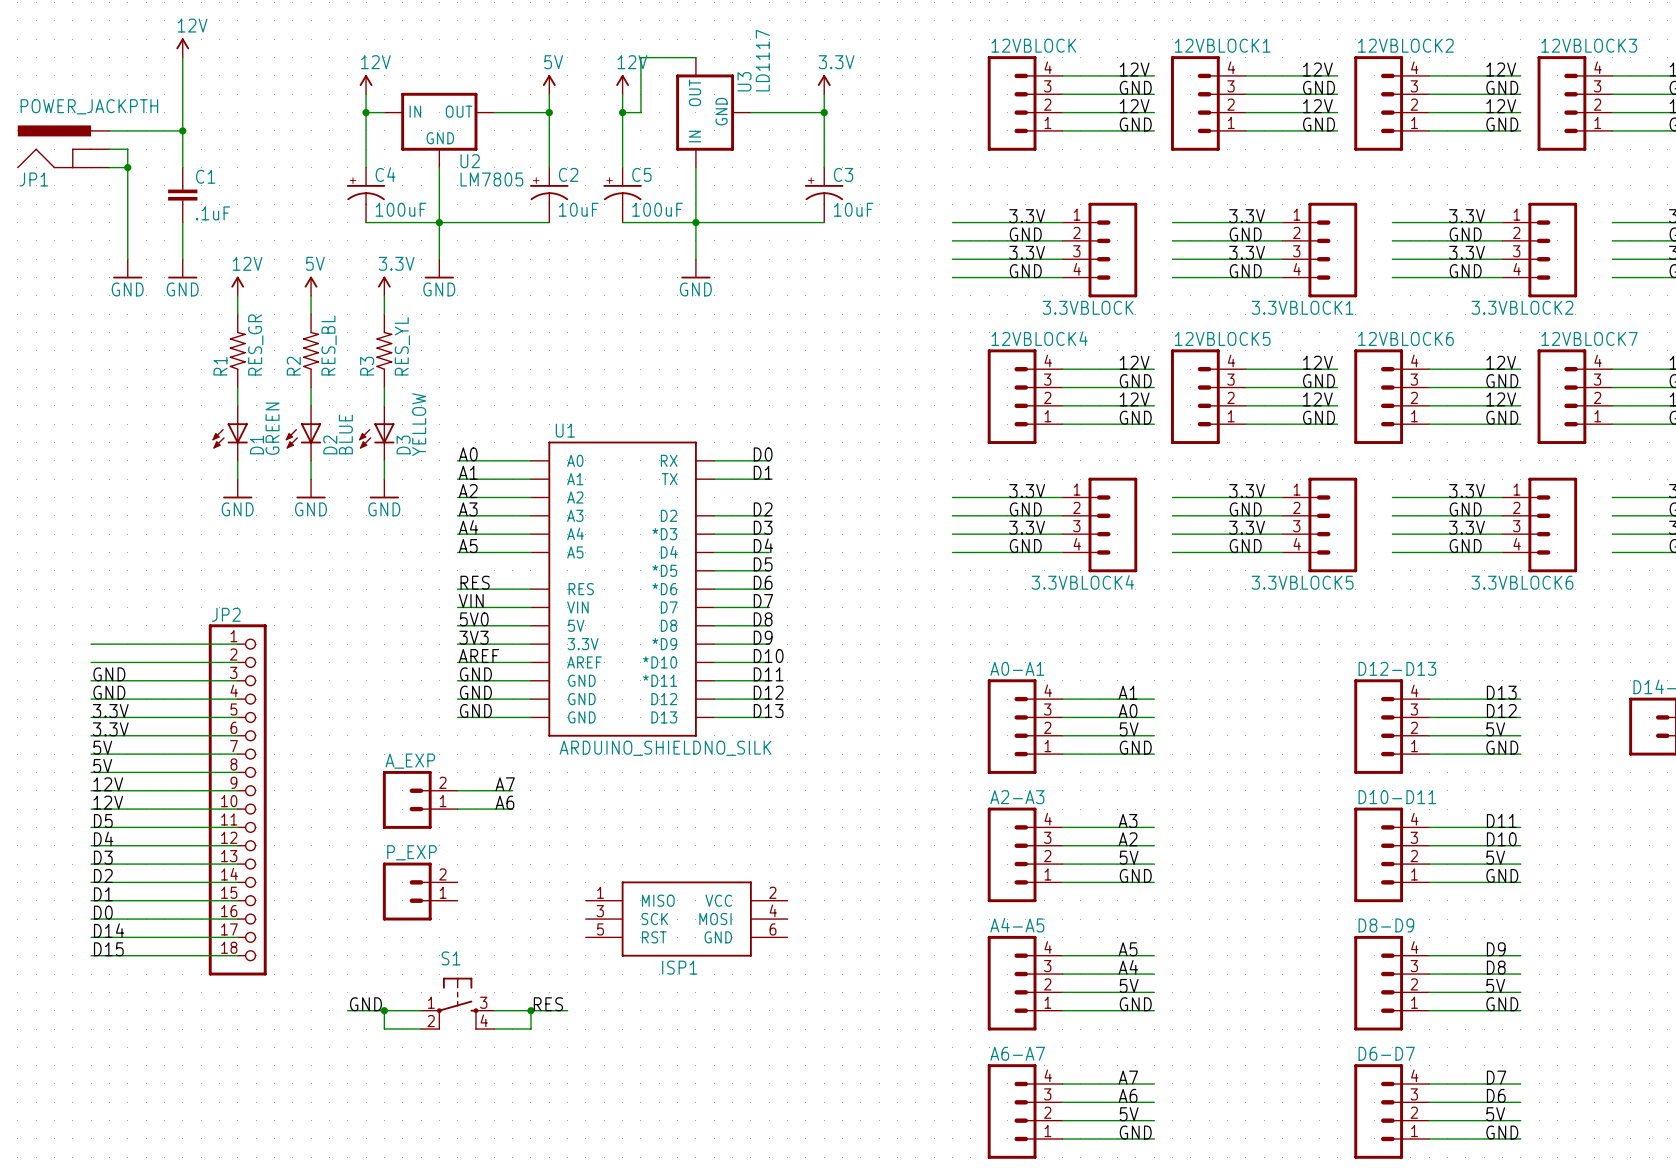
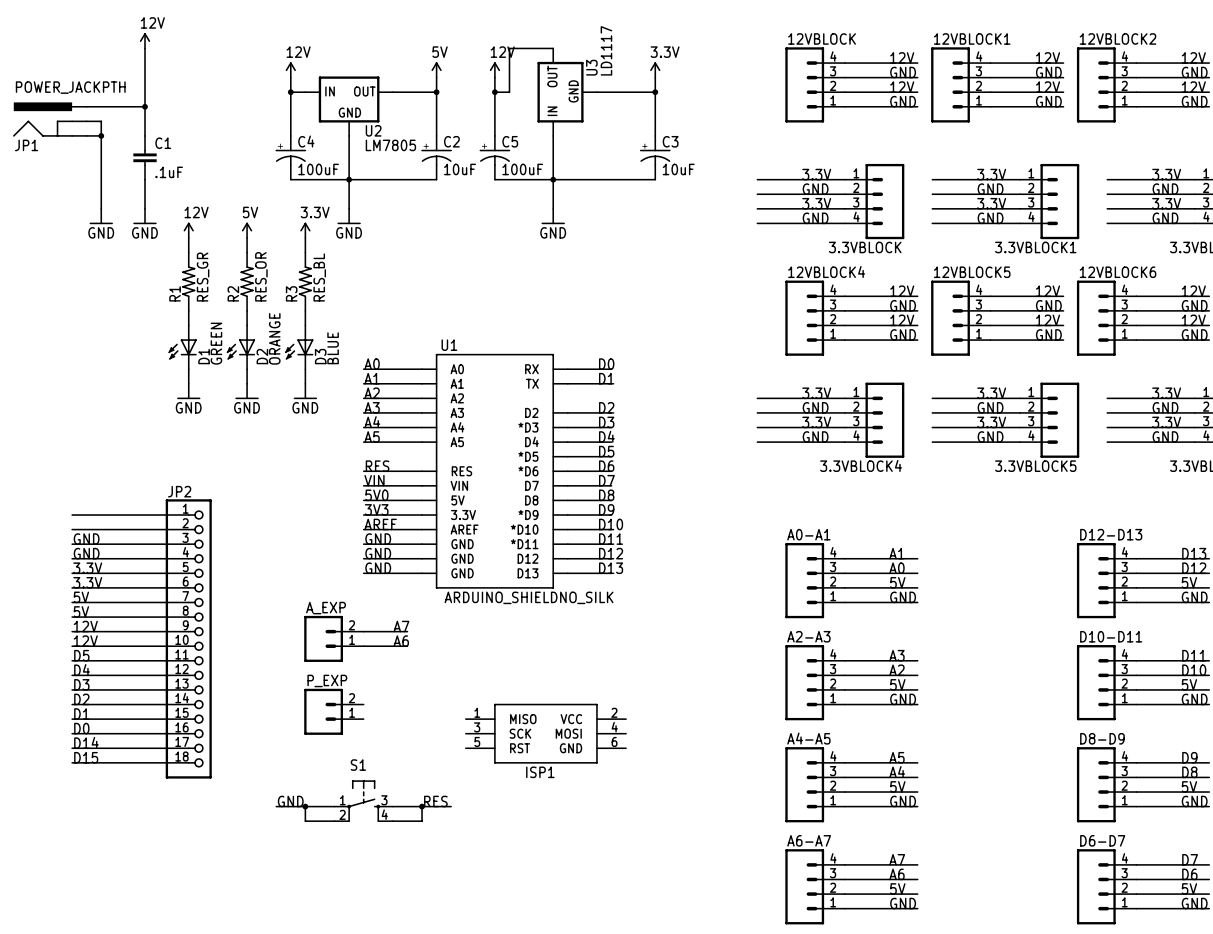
R2 value: RES_BL (329, 345) -> RES_OR (261, 276)
R3 value: RES_YL (402, 346) -> RES_BL (319, 277)
D3 value: YELLOW (419, 424) -> BLUE (333, 348)
D2 value: BLUE (345, 434) -> ORANGE (274, 338)

